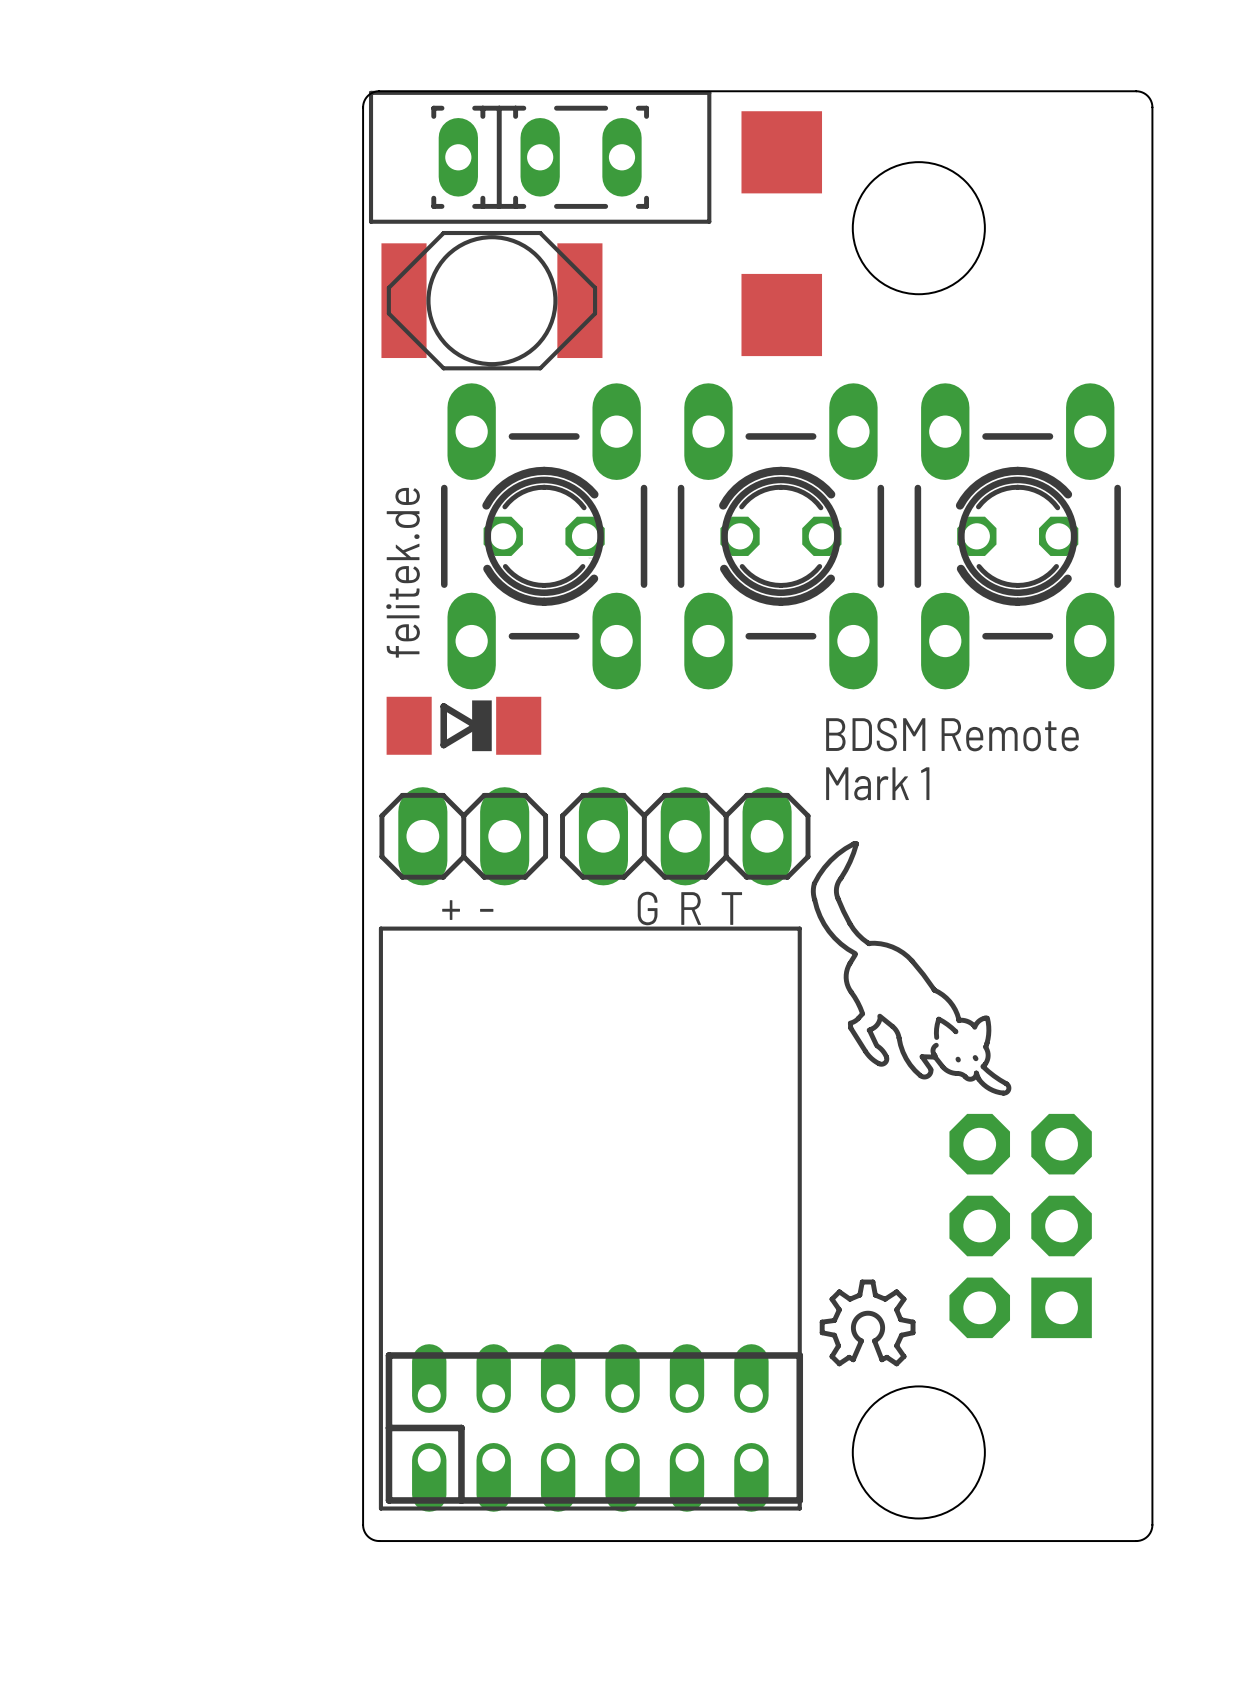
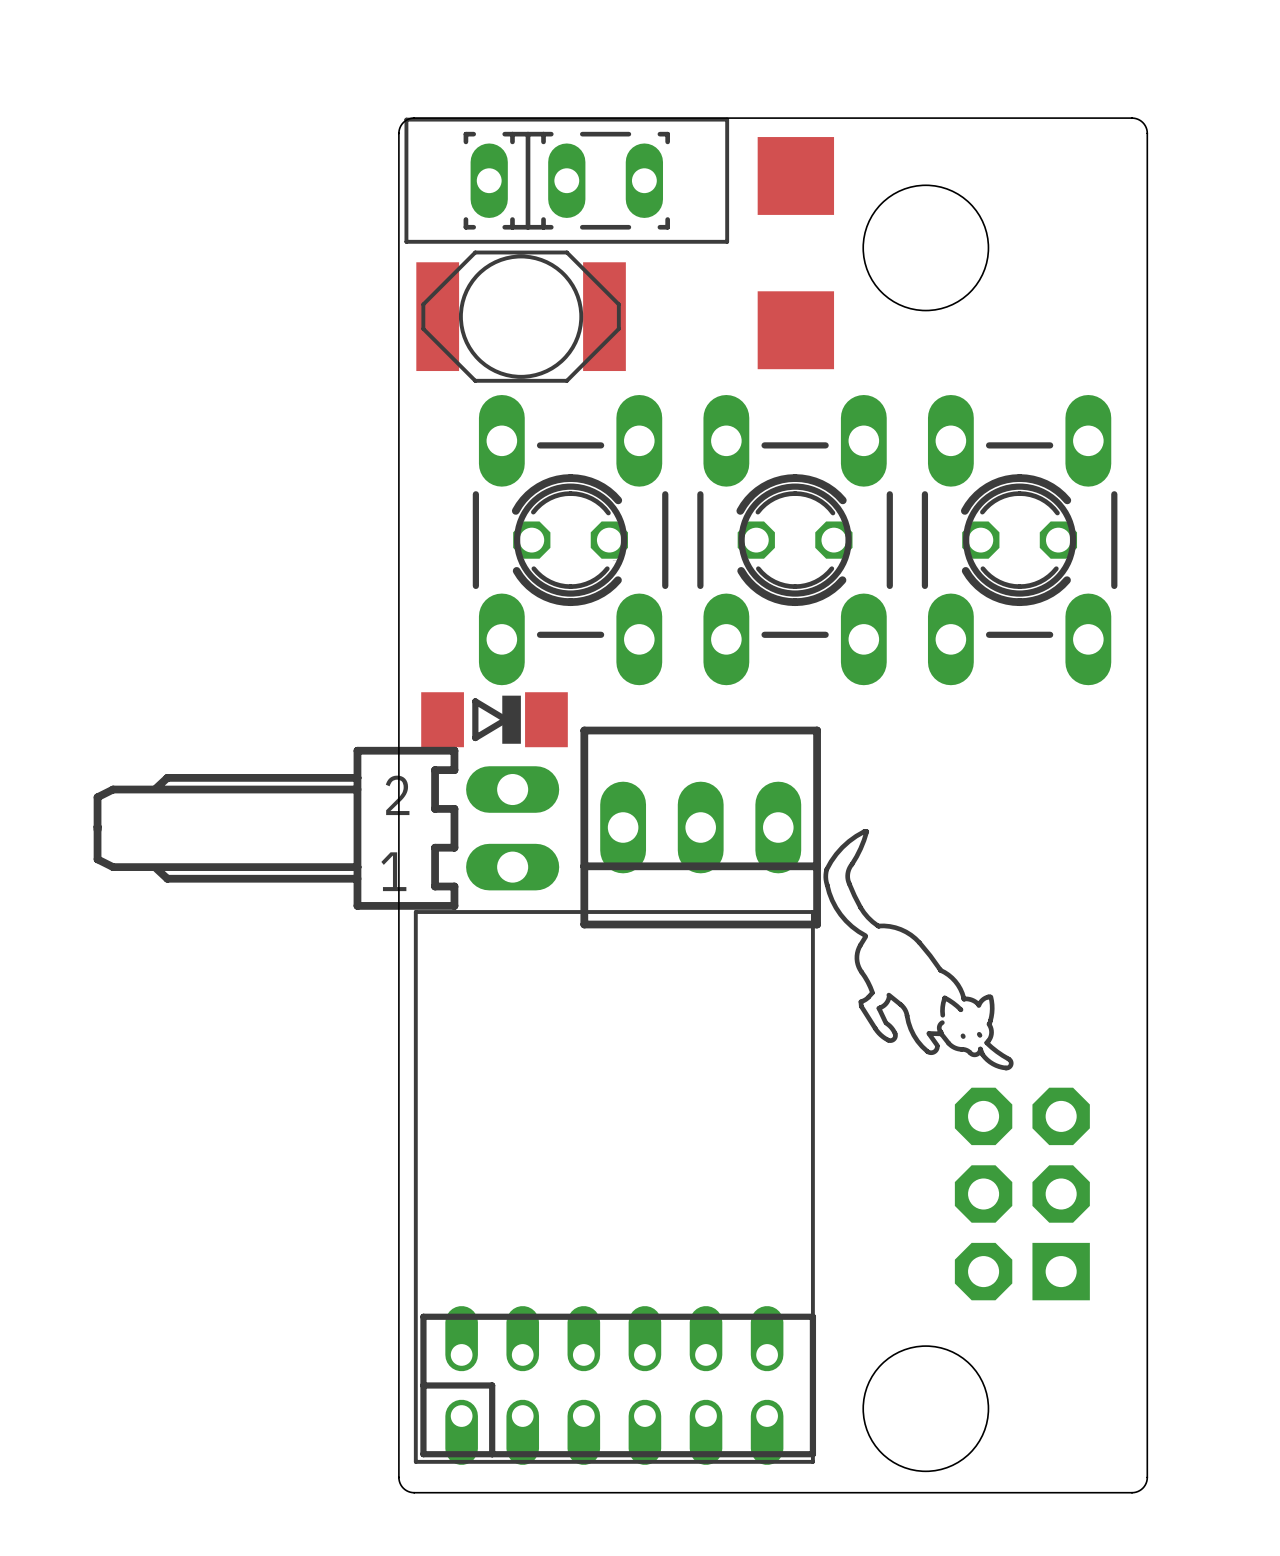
text: felitek.de (403, 572) -> none
text: BDSM Remote (952, 734) -> none
text: Mark 1 (877, 783) -> none
part footprint: [560, 787, 811, 886] -> [580, 726, 821, 929]
part: (463, 836) -> none
part: none -> (326, 828)
text: G R T (689, 908) -> none
text: + - (467, 910) -> none
drawing: [819, 1279, 916, 1367] -> none

